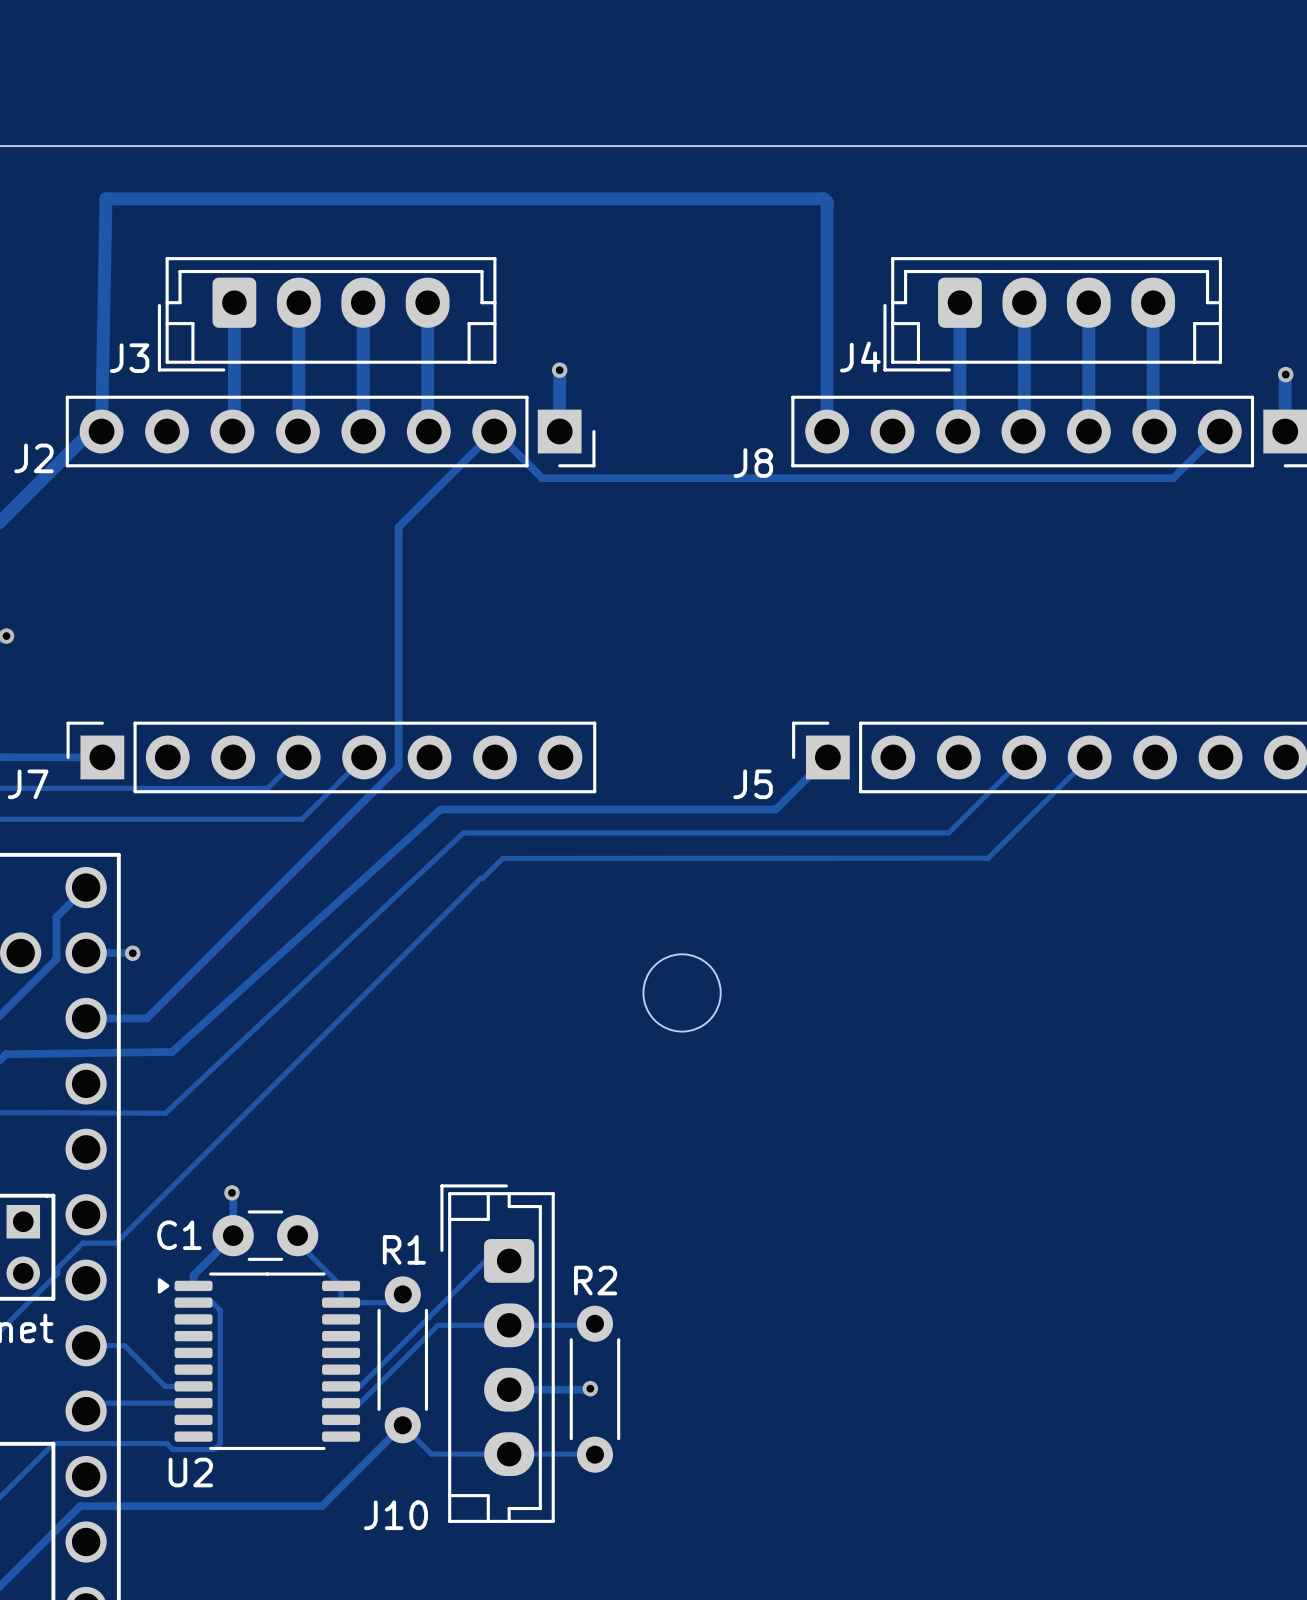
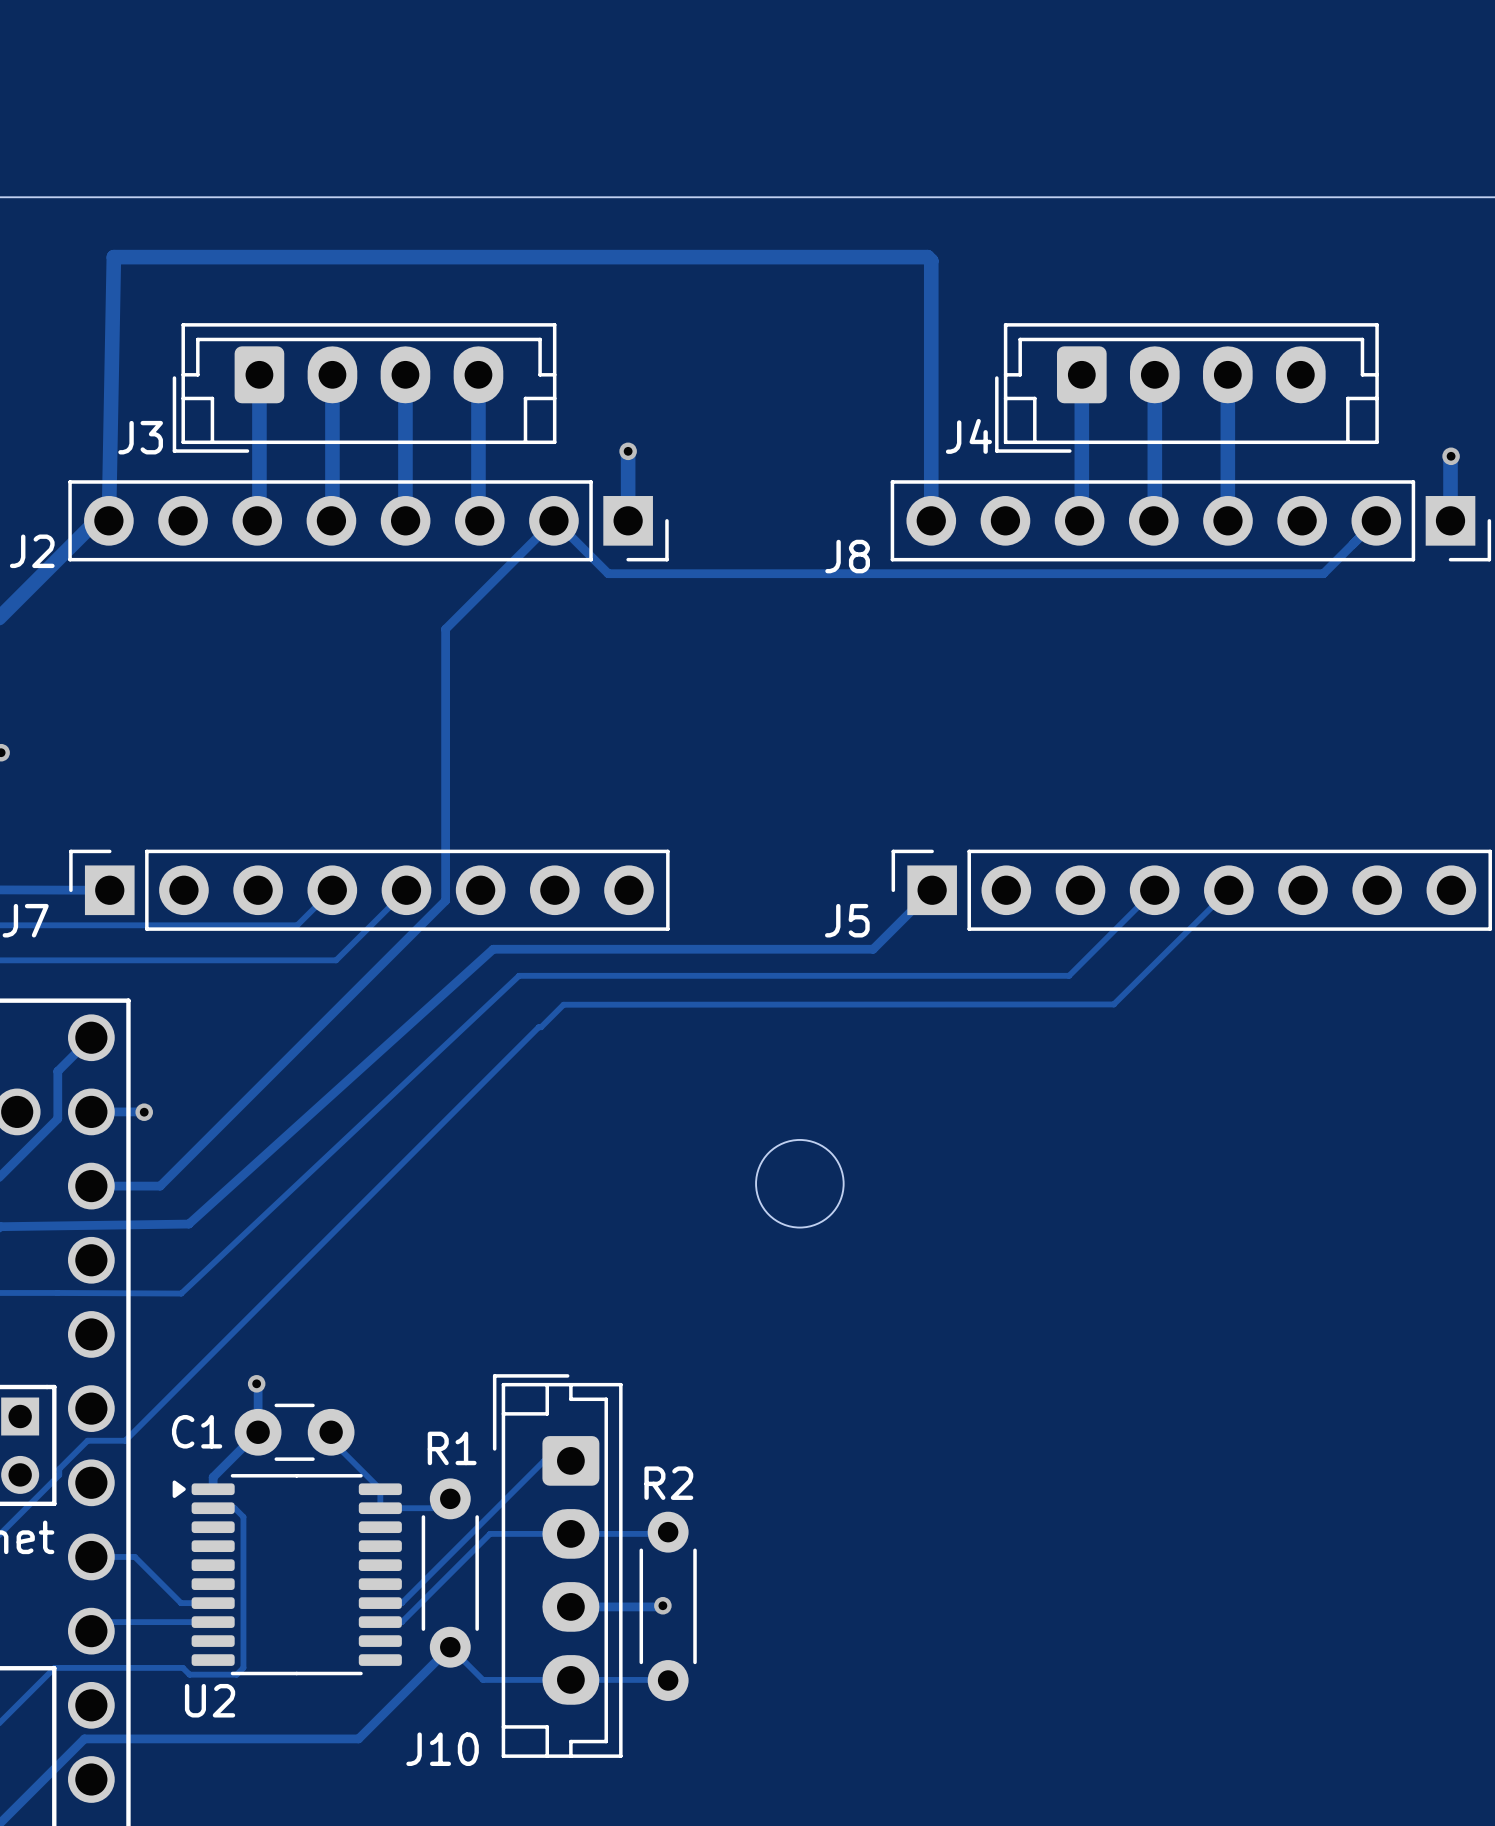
track: (1153, 302) (1154, 431) -> none
round board edge position: (682, 992) -> (799, 1183)

